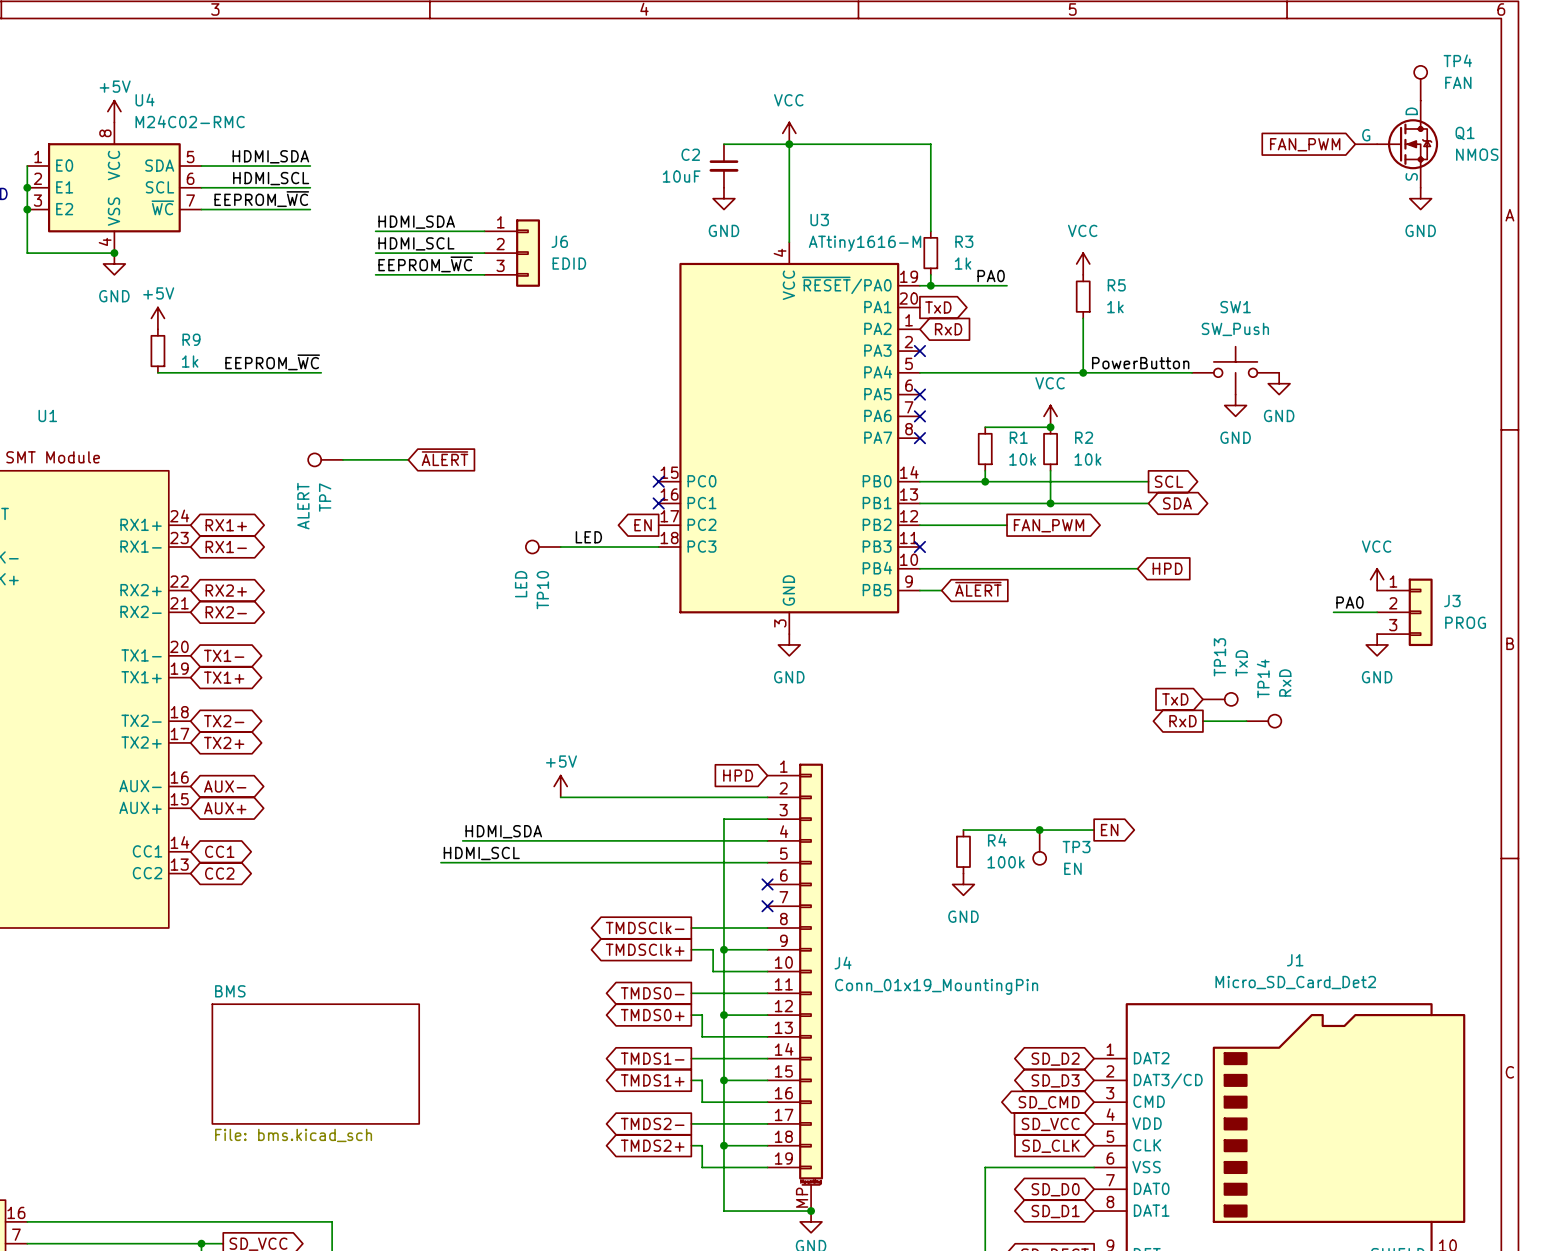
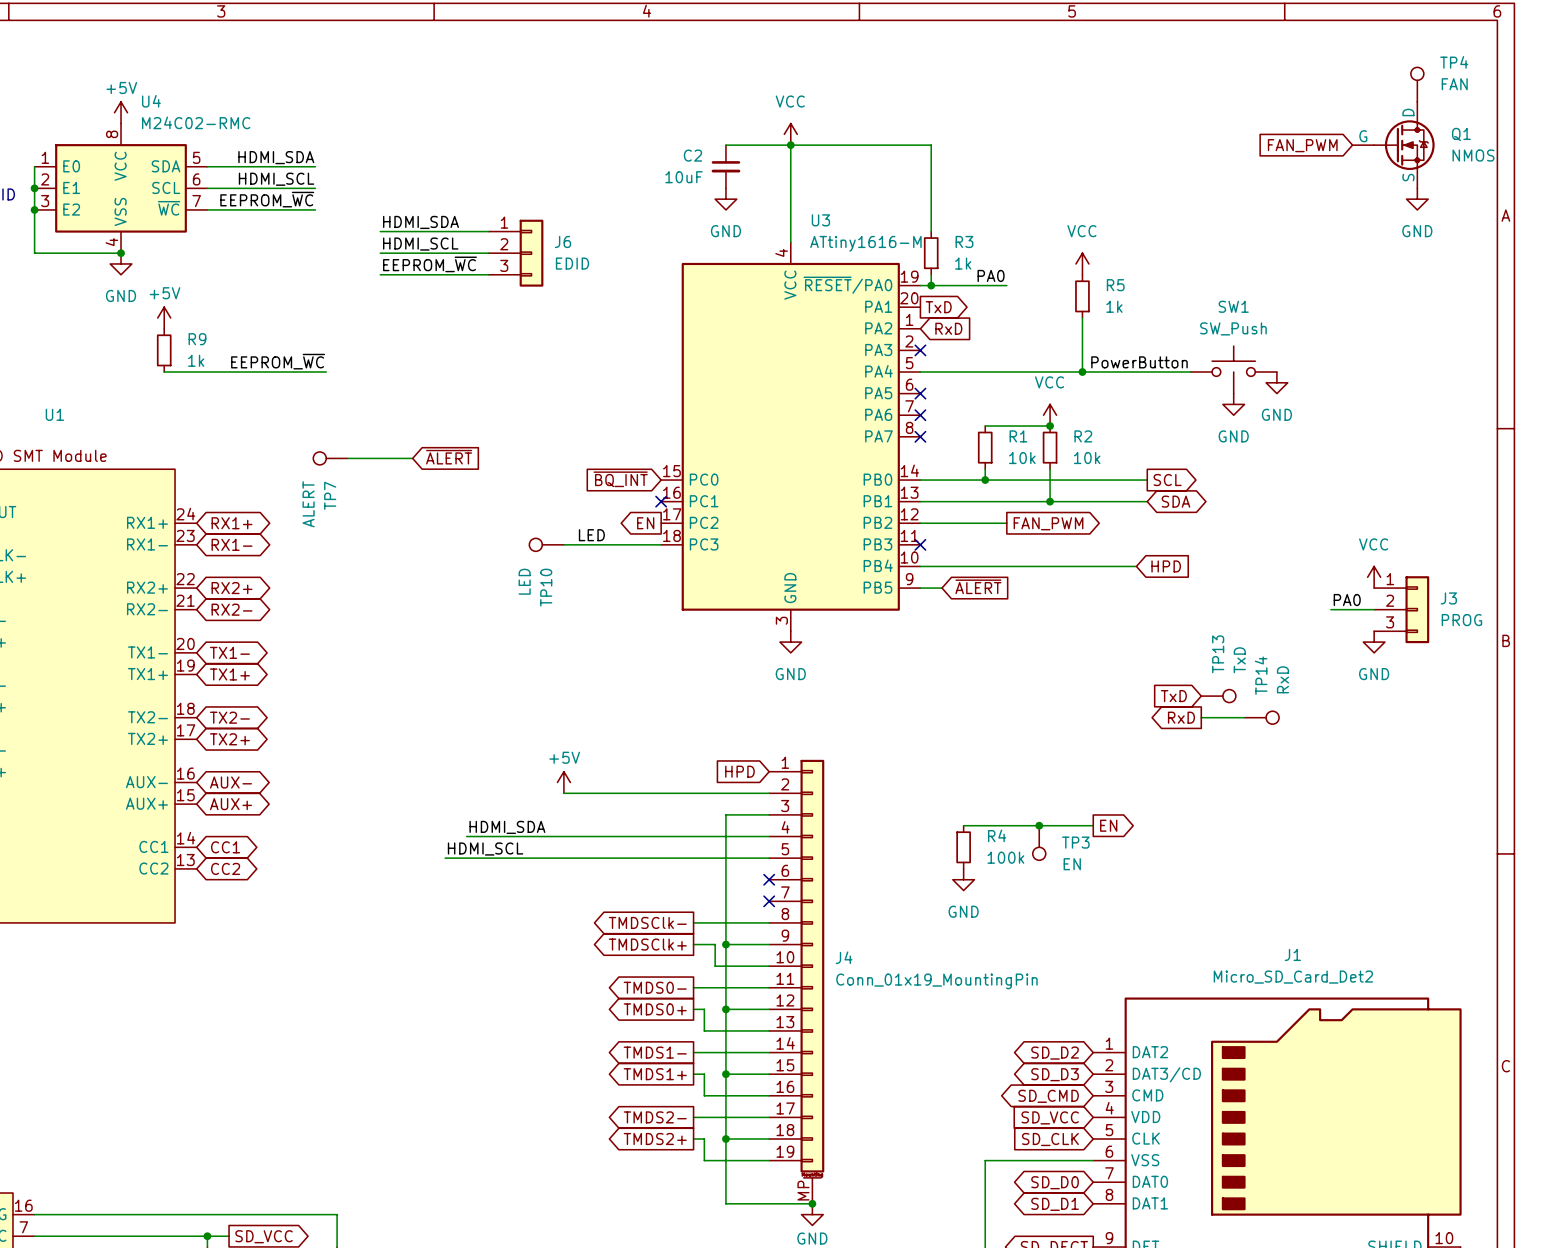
global label: none -> ~{BQ_INT} (620, 479)
no-connect mark: (658, 481) -> none
sheet BMS: File: bms.kicad_sch (315, 1064) -> none

